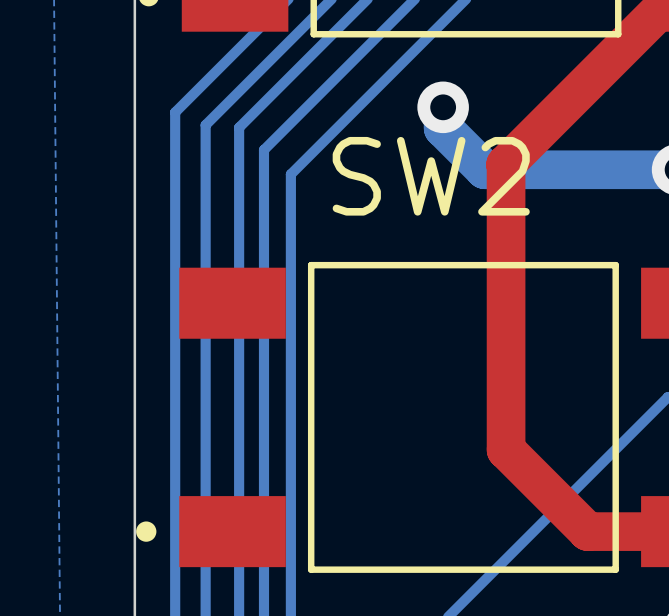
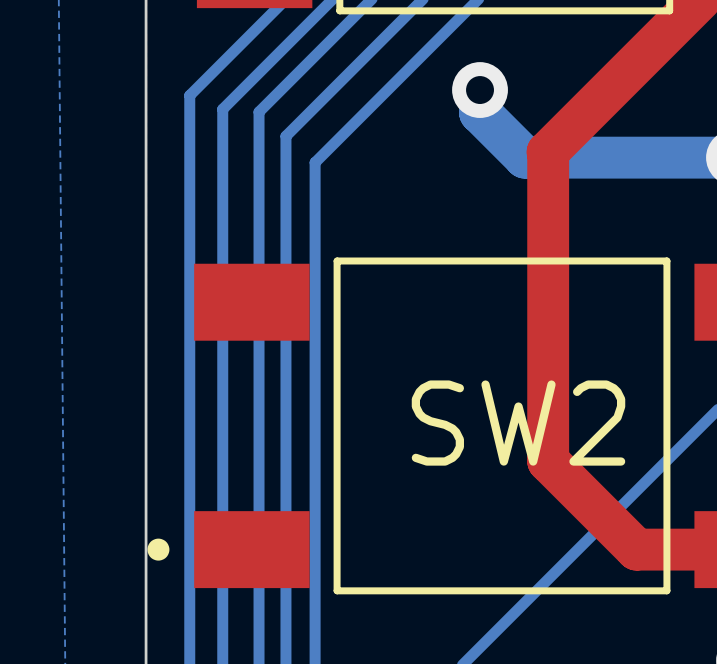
SW2 name position: SW2 (431, 176) -> SW2 (518, 423)

